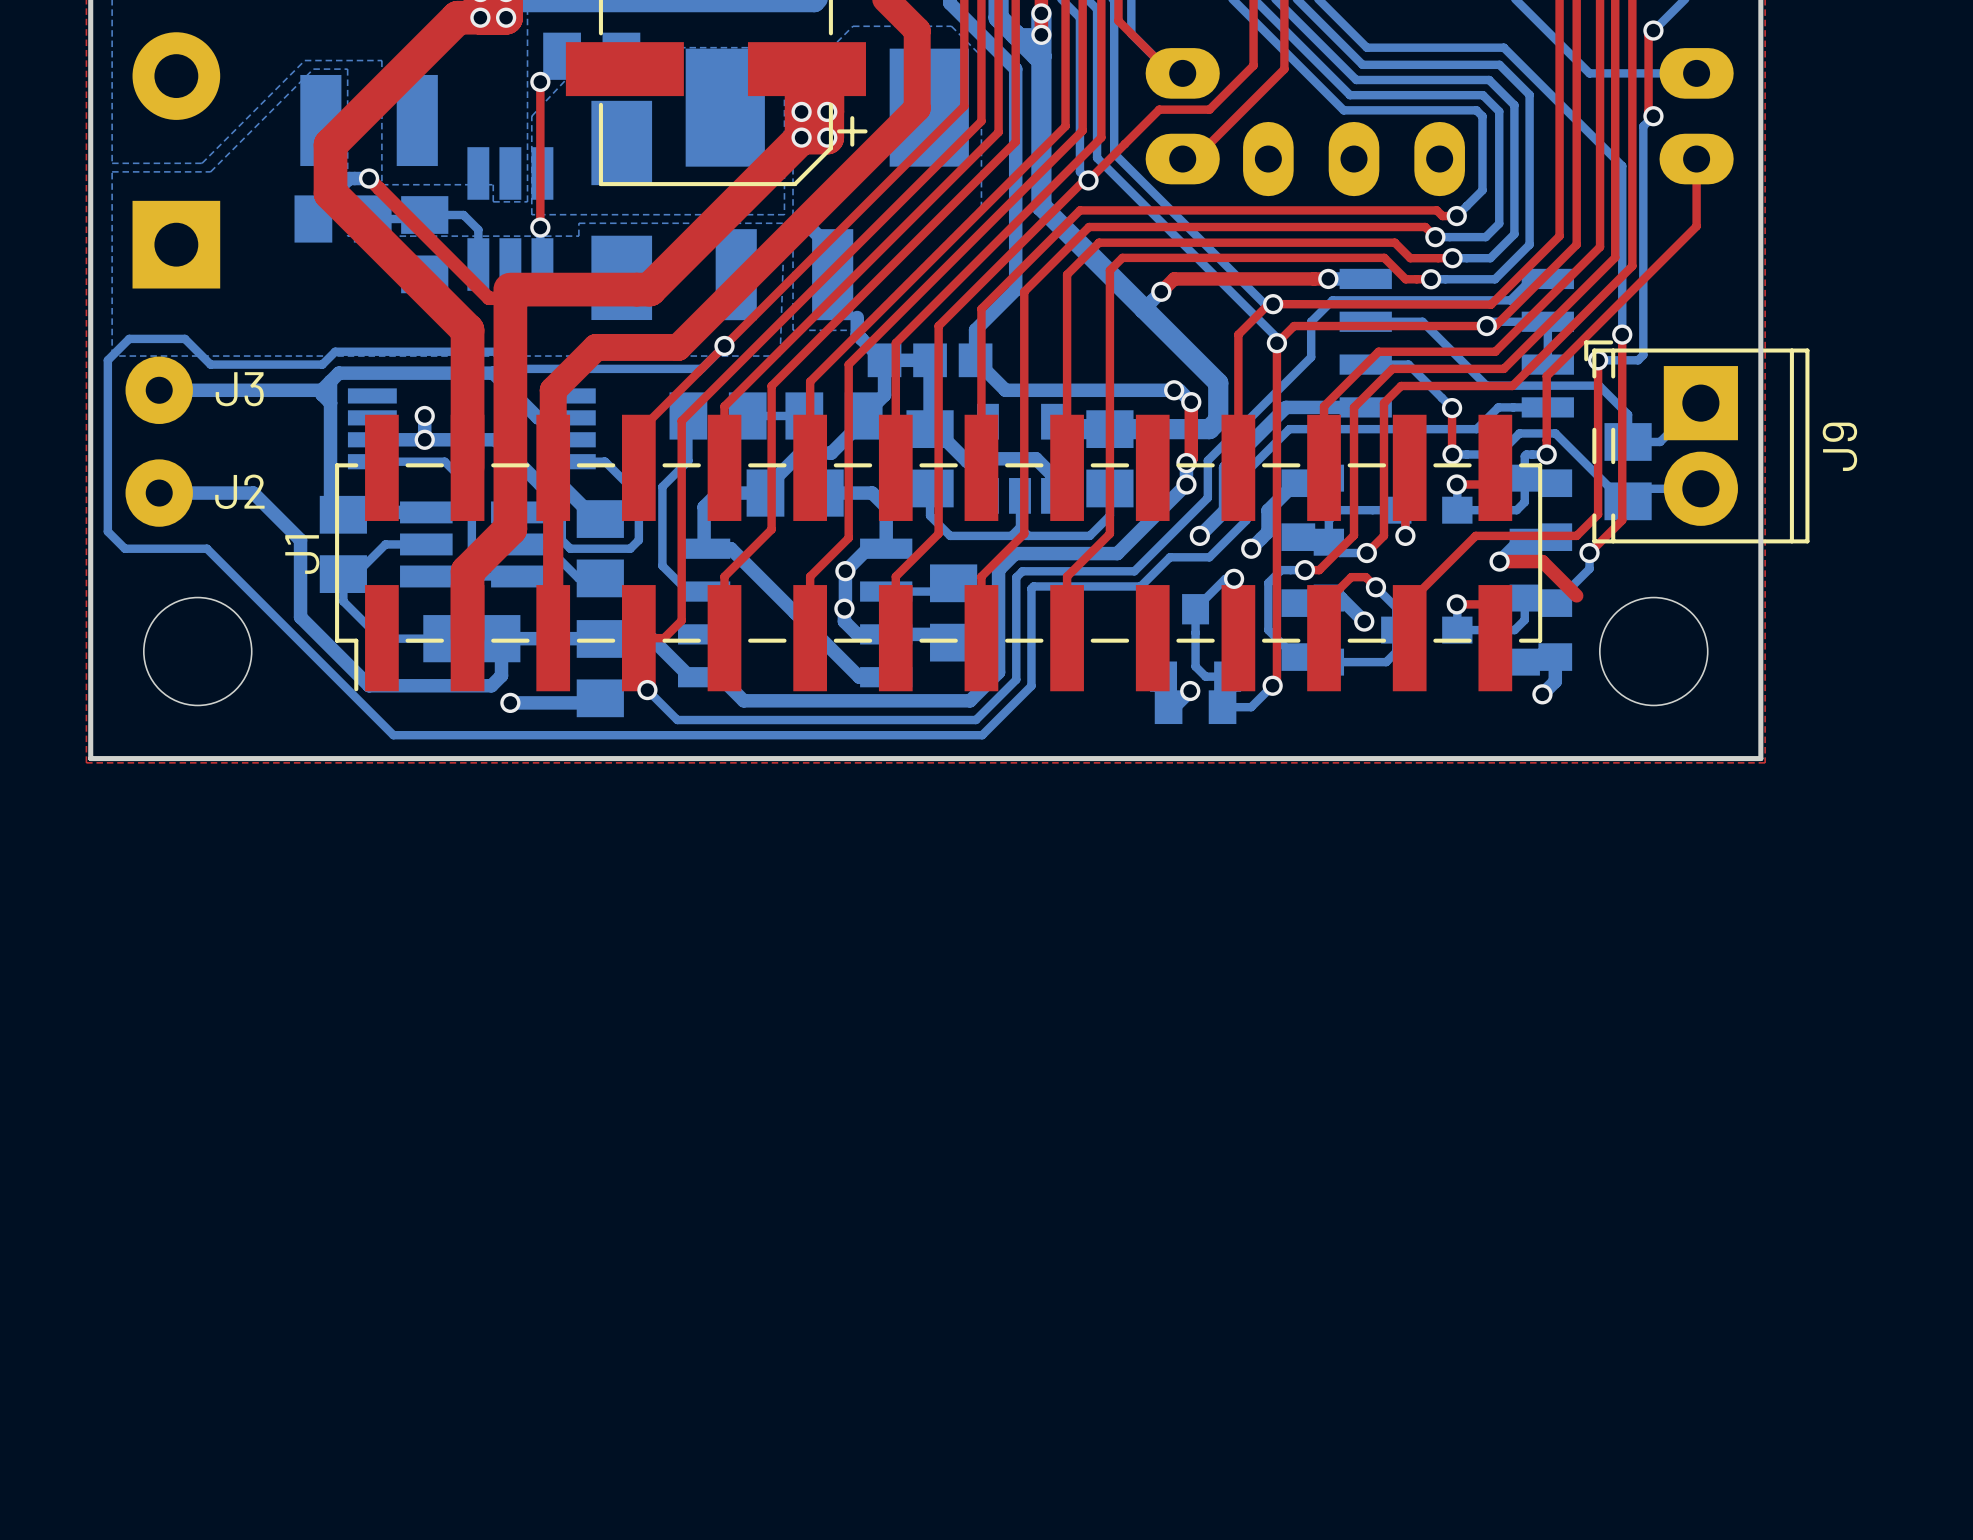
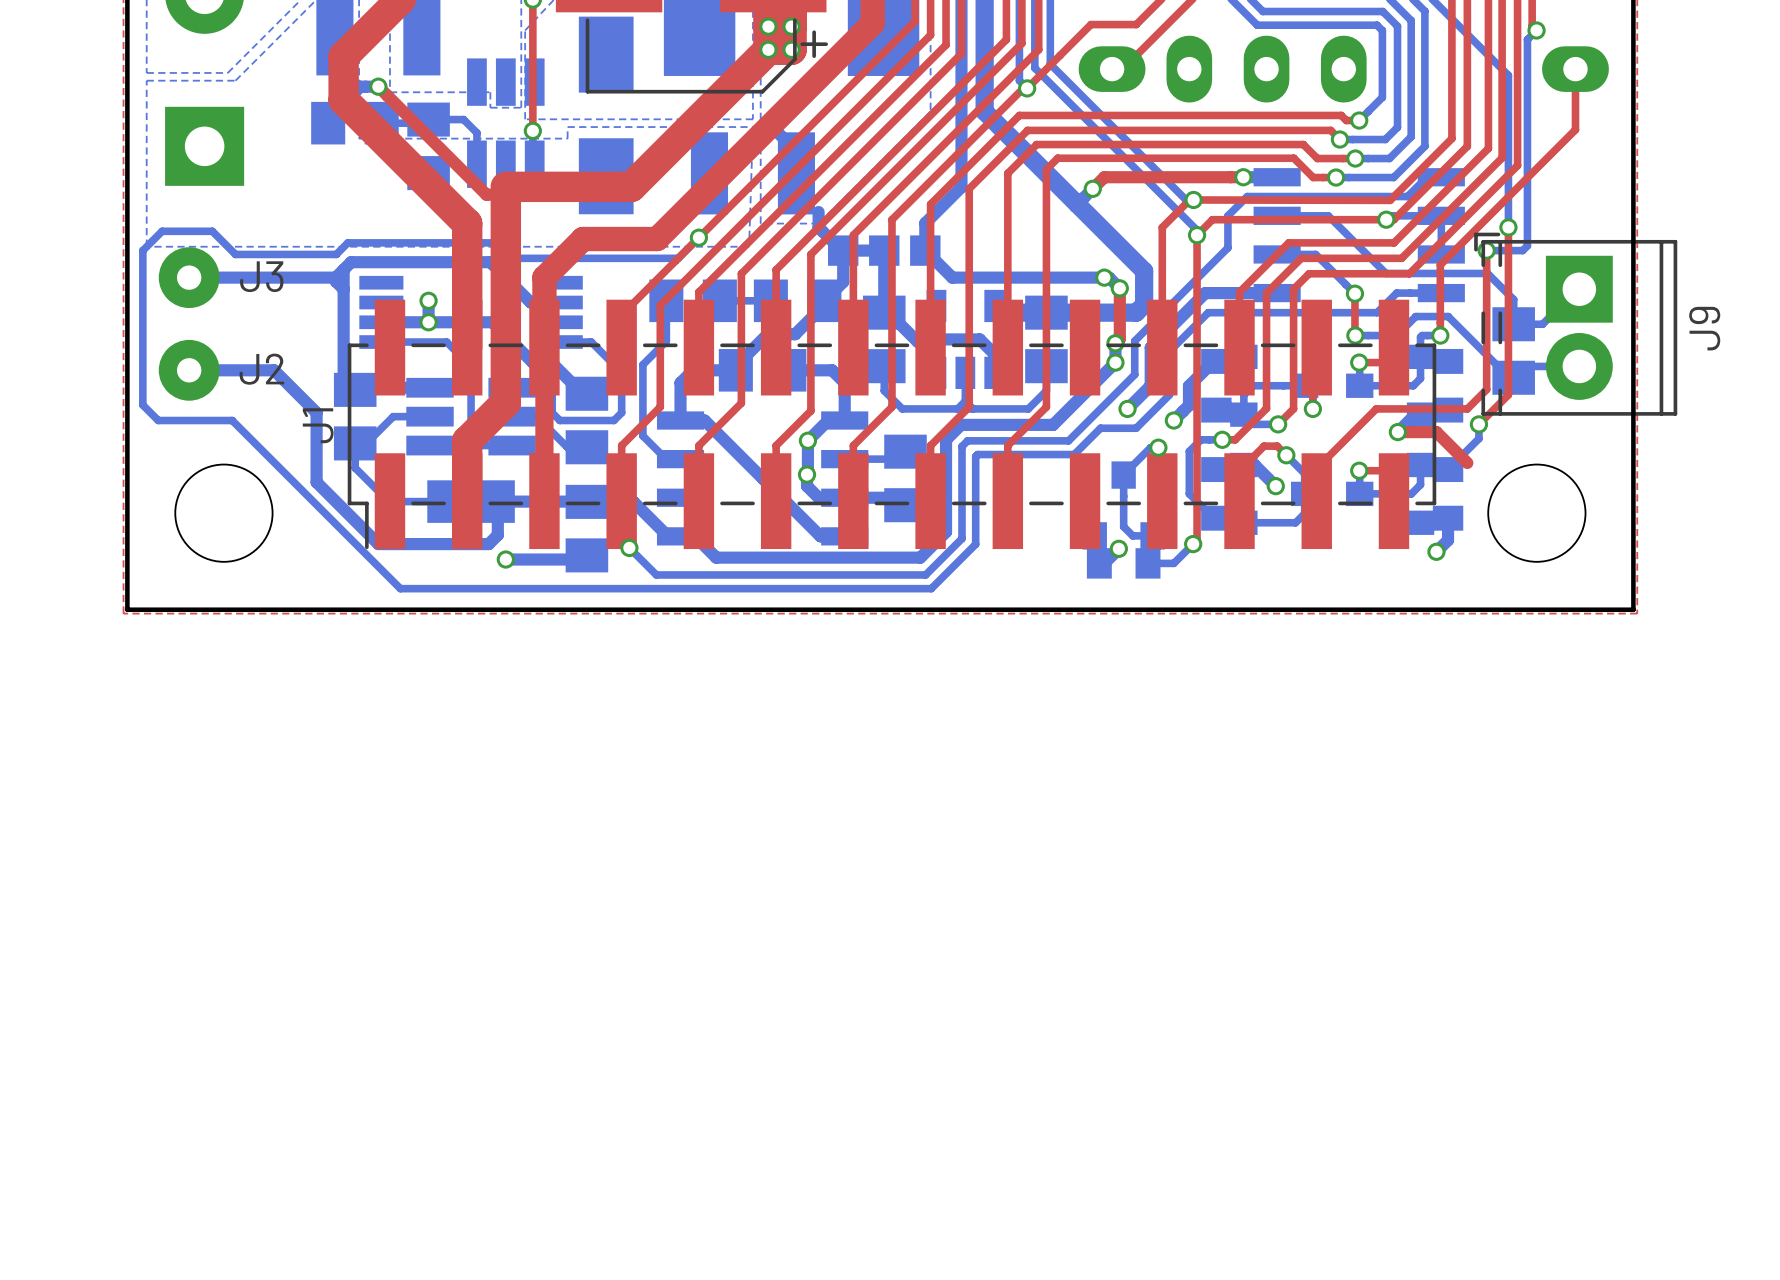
top track: (681, 533) (681, 620) (664, 638) (638, 638) -> (660, 407) (621, 445) (621, 501)

